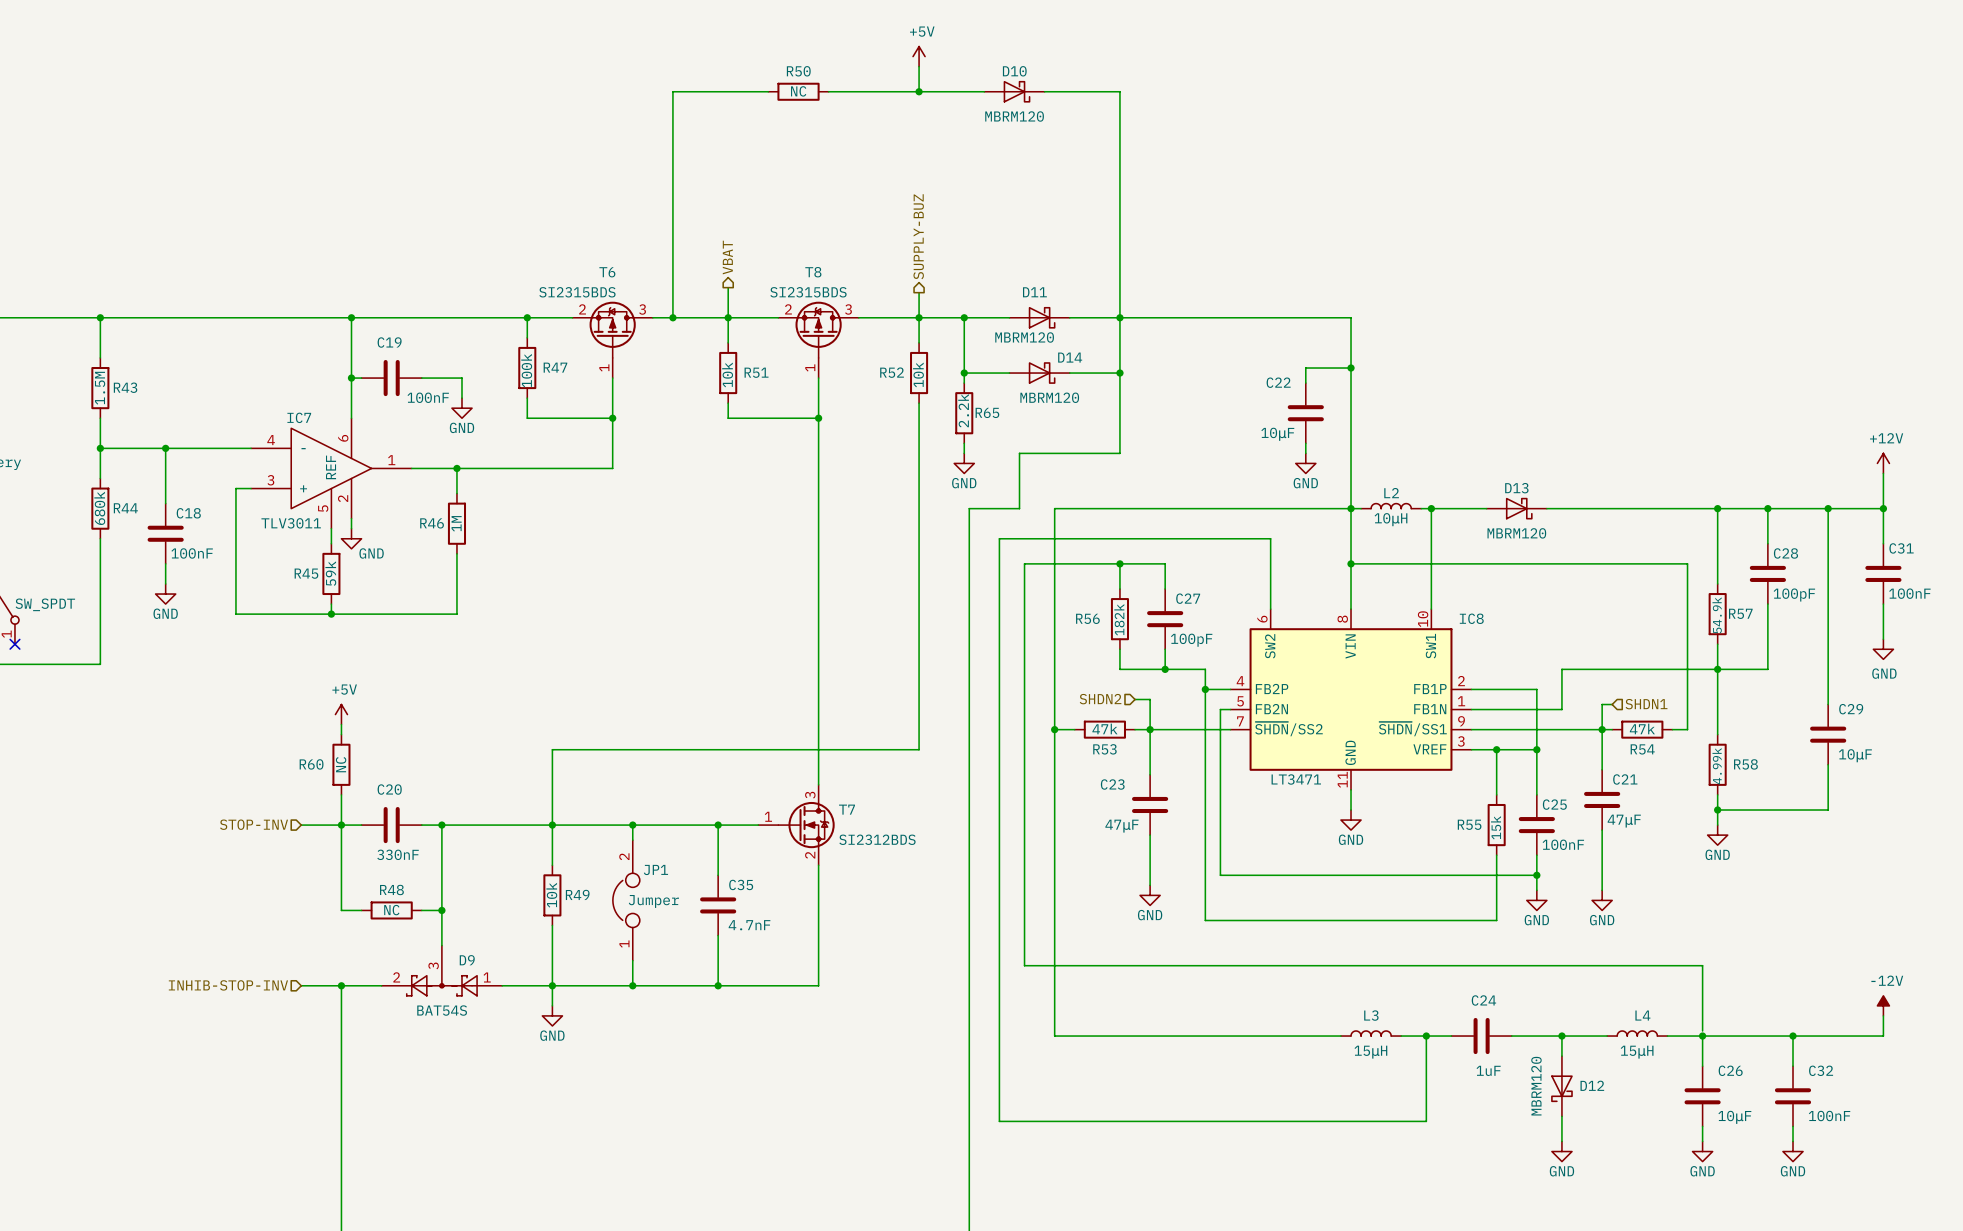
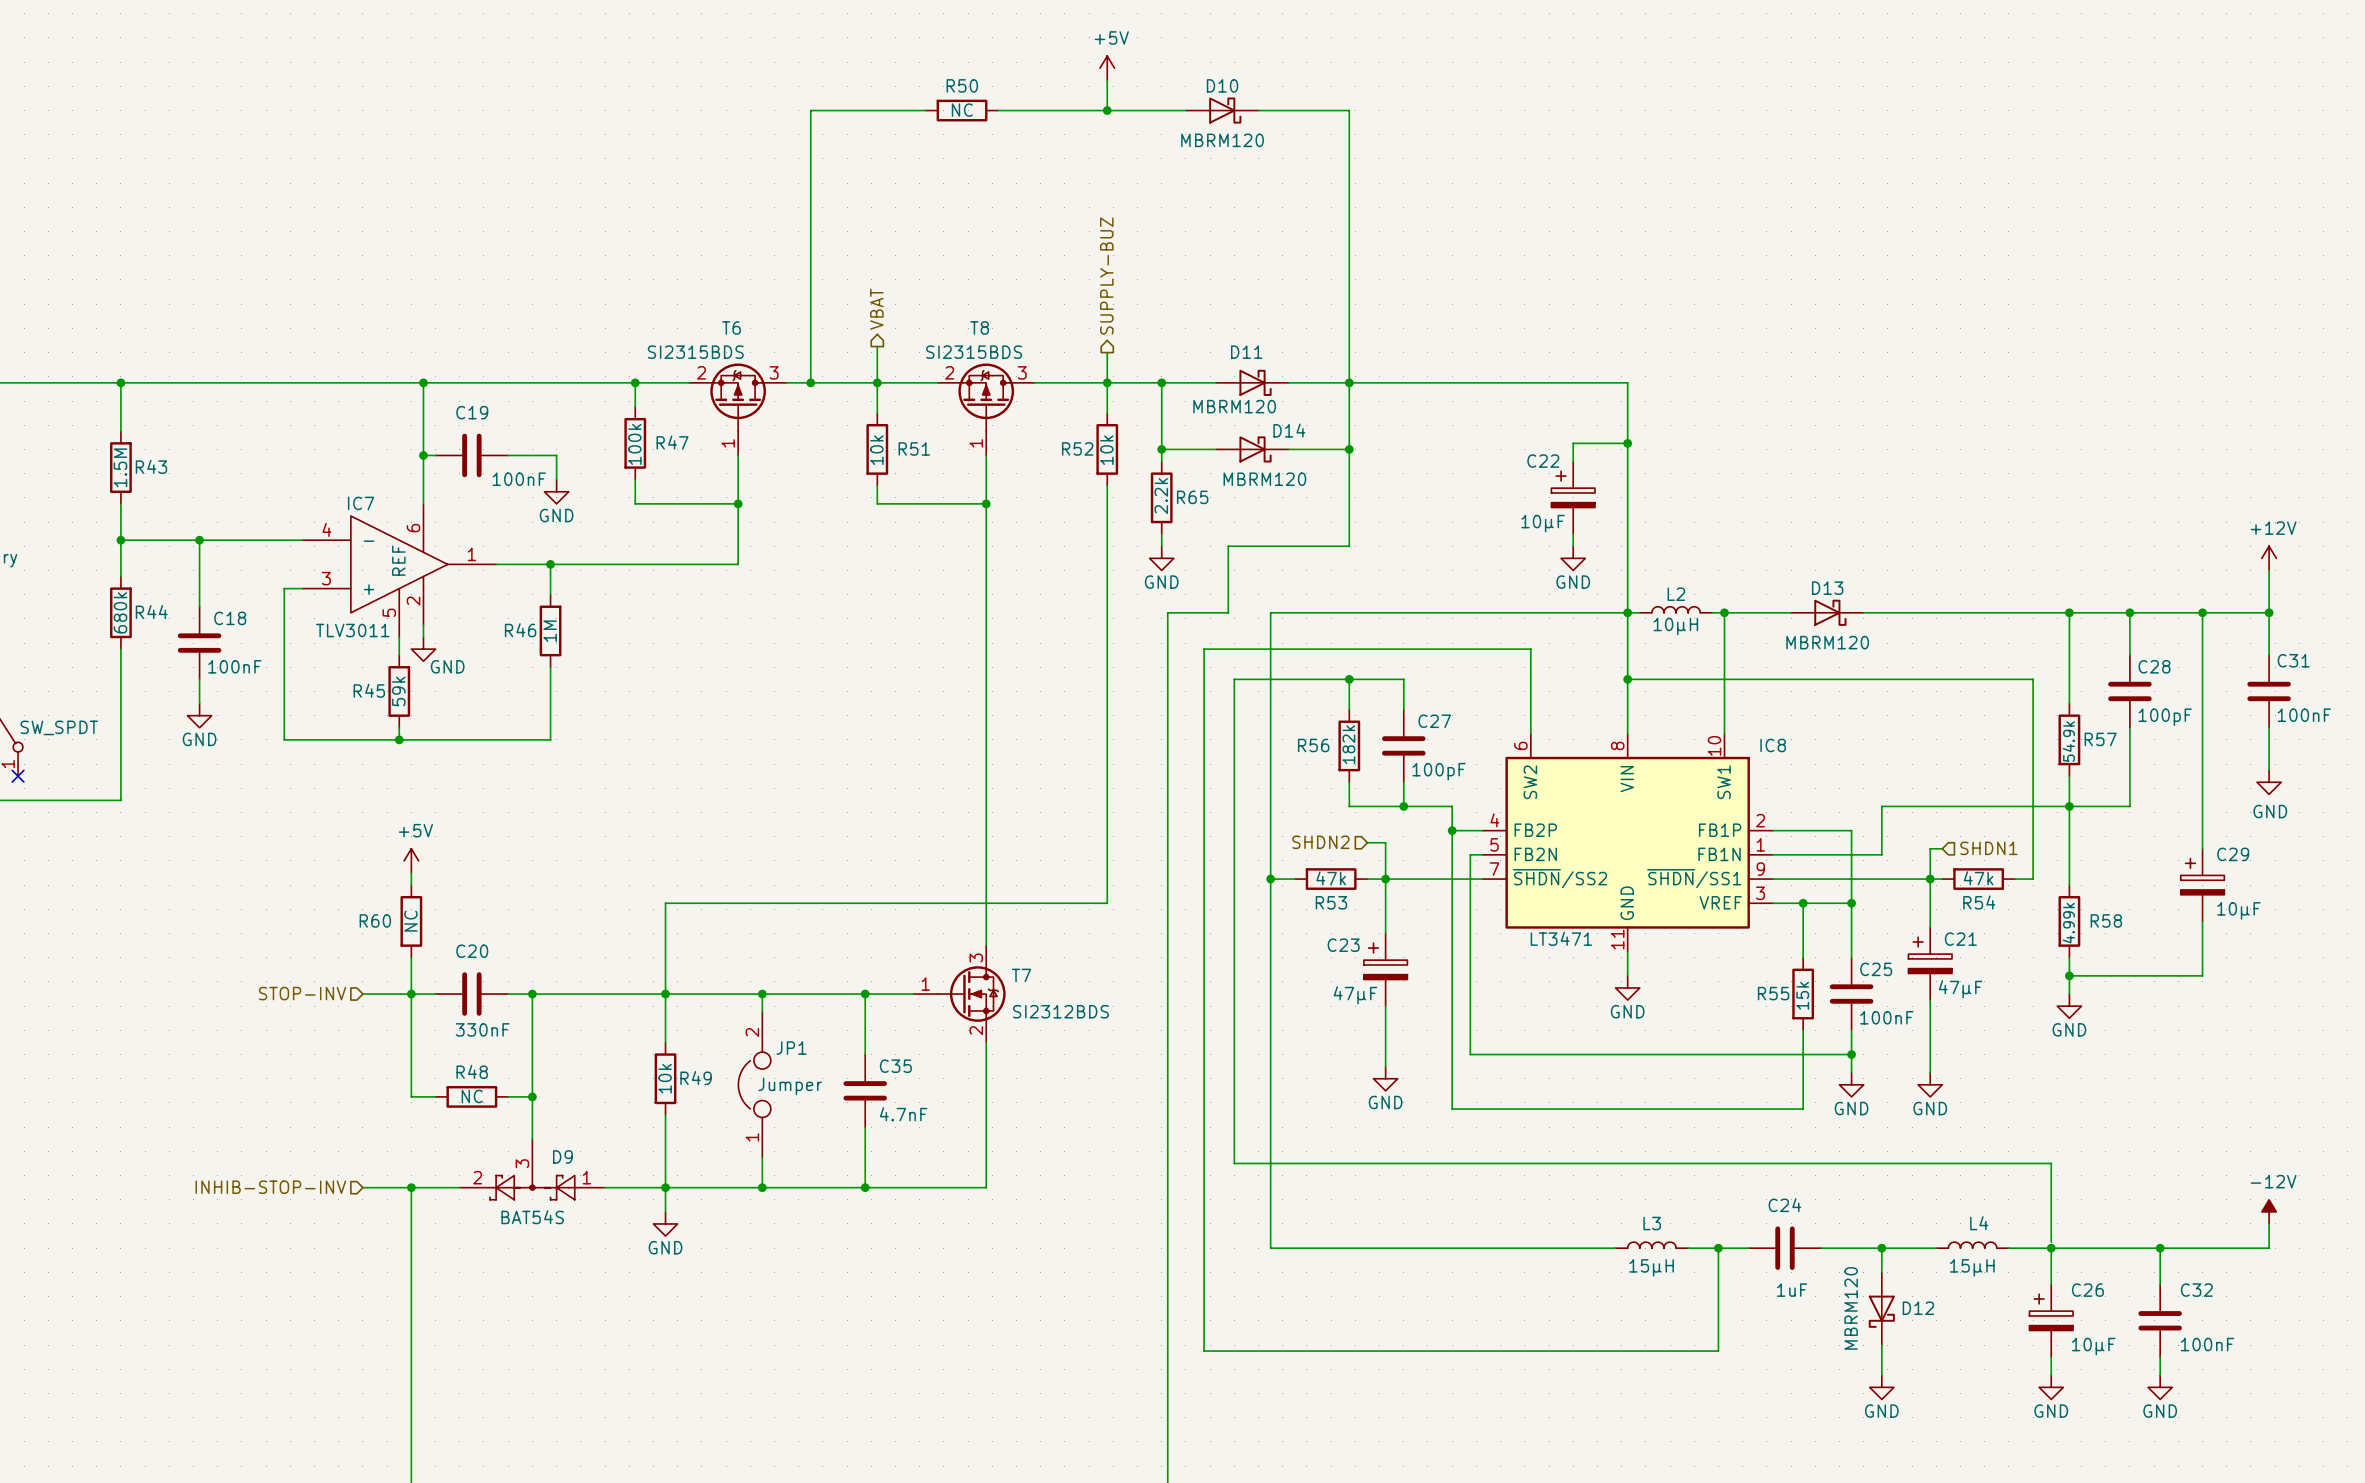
C22 symbol: [1287, 383, 1324, 444] -> [1551, 461, 1595, 535]
C29 symbol: [1810, 704, 1847, 765] -> [2180, 848, 2225, 922]
C21 symbol: [1584, 769, 1621, 831] -> [1908, 927, 1953, 1001]
C23 symbol: [1132, 774, 1169, 836] -> [1363, 933, 1408, 1007]
C26 symbol: [1684, 1066, 1721, 1127] -> [2029, 1284, 2074, 1358]

